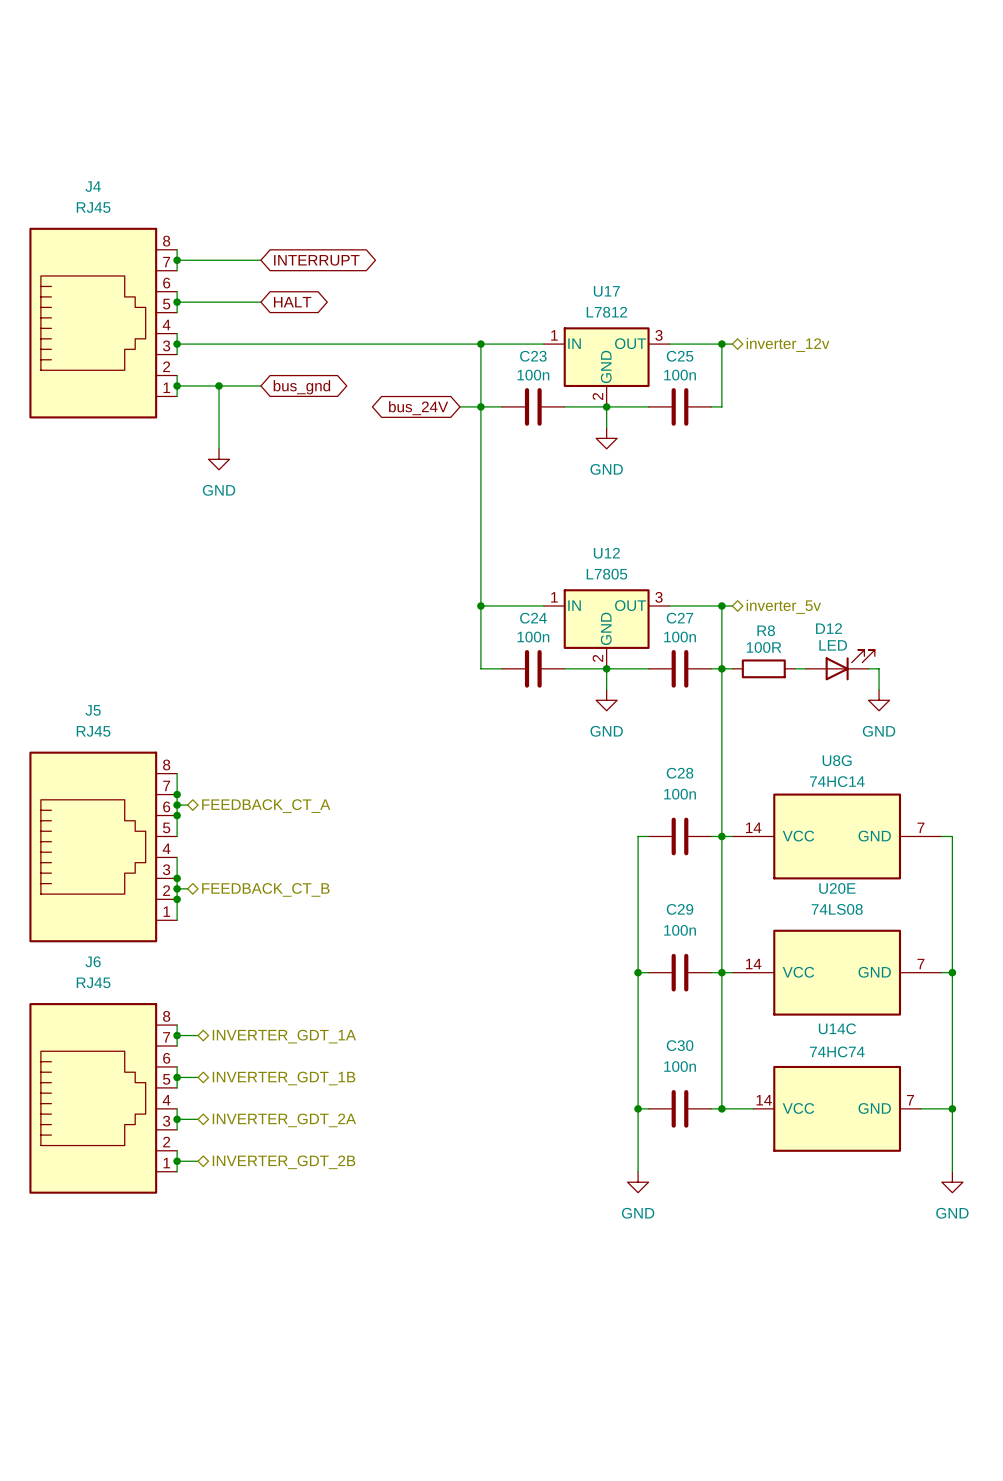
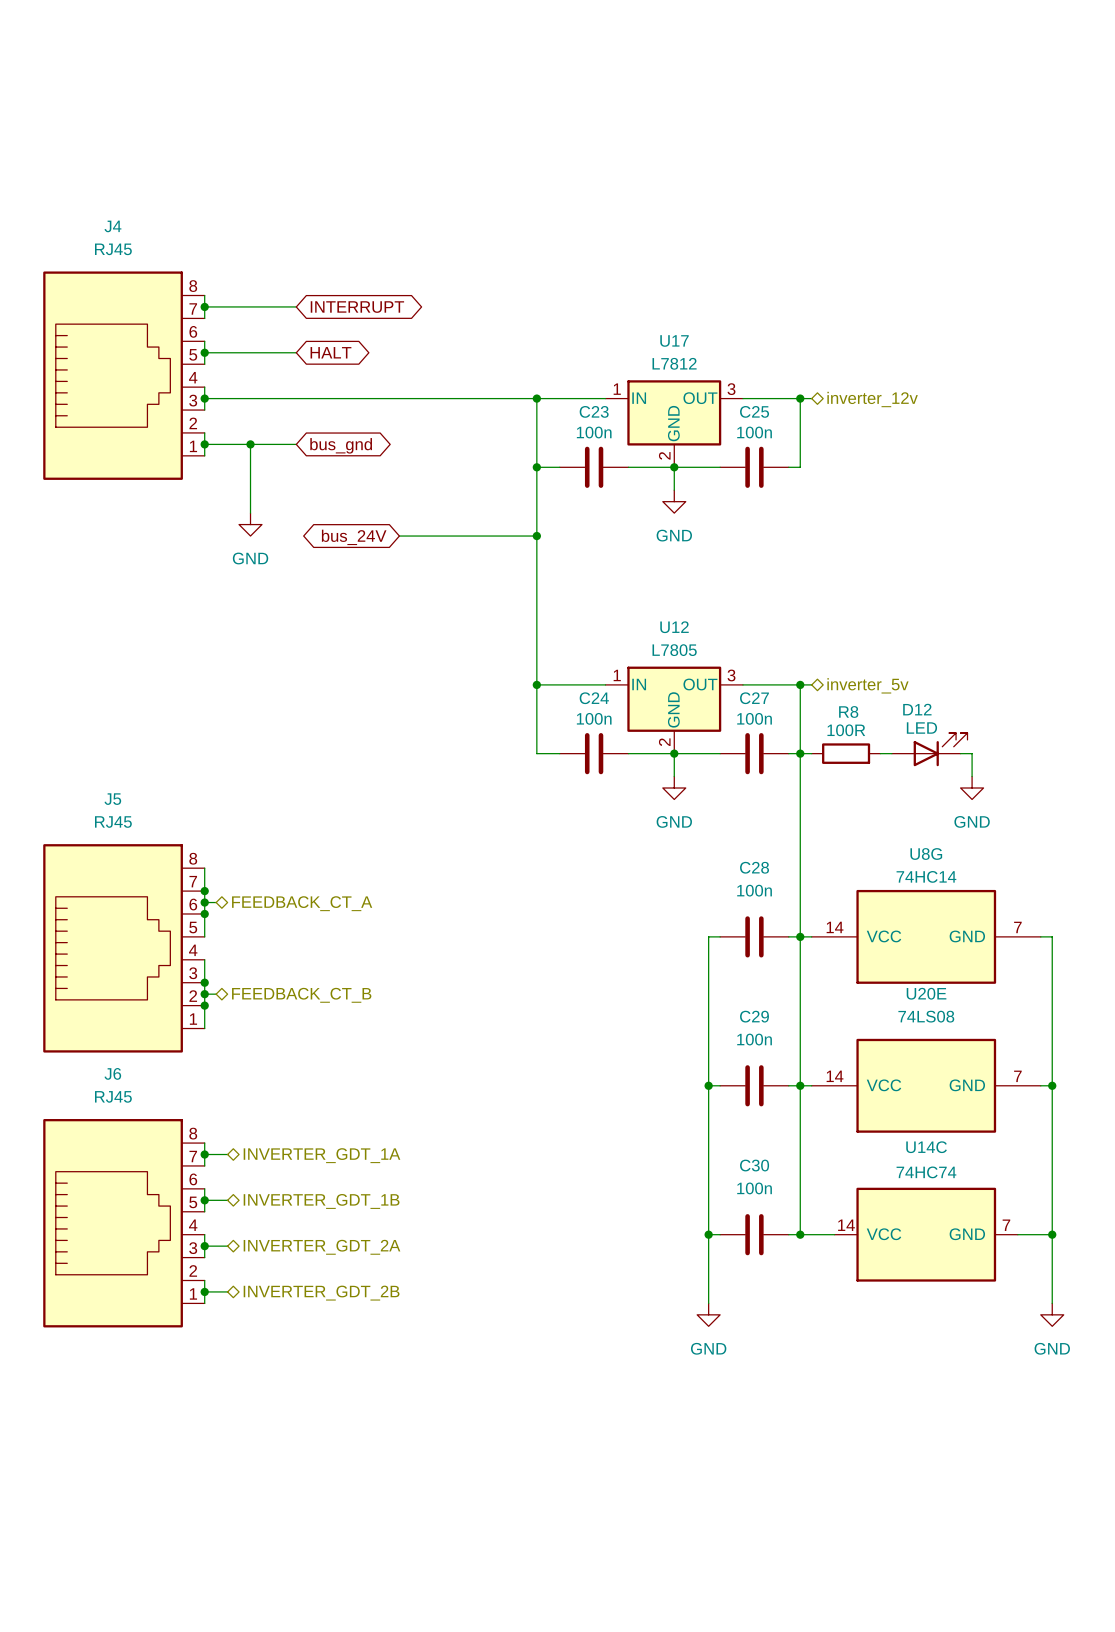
wire: (459, 406) (480, 406) -> none
global label position: bus_24V (418, 408) -> bus_24V (354, 537)
wire: none -> (399, 536) (536, 536)
junction: none -> (536, 536)

